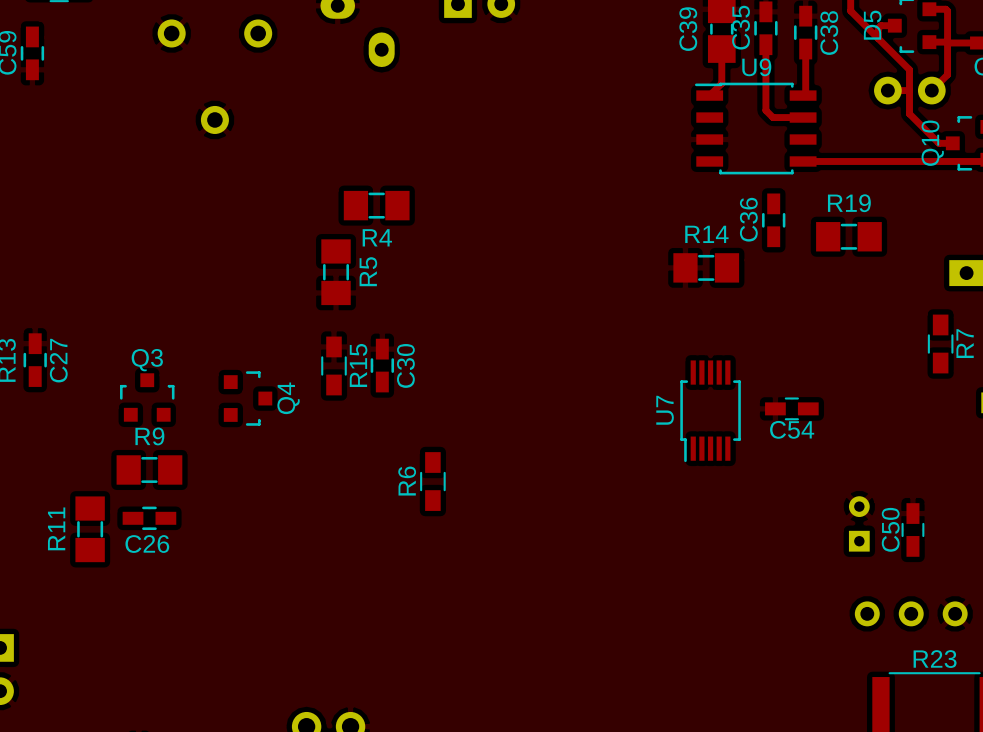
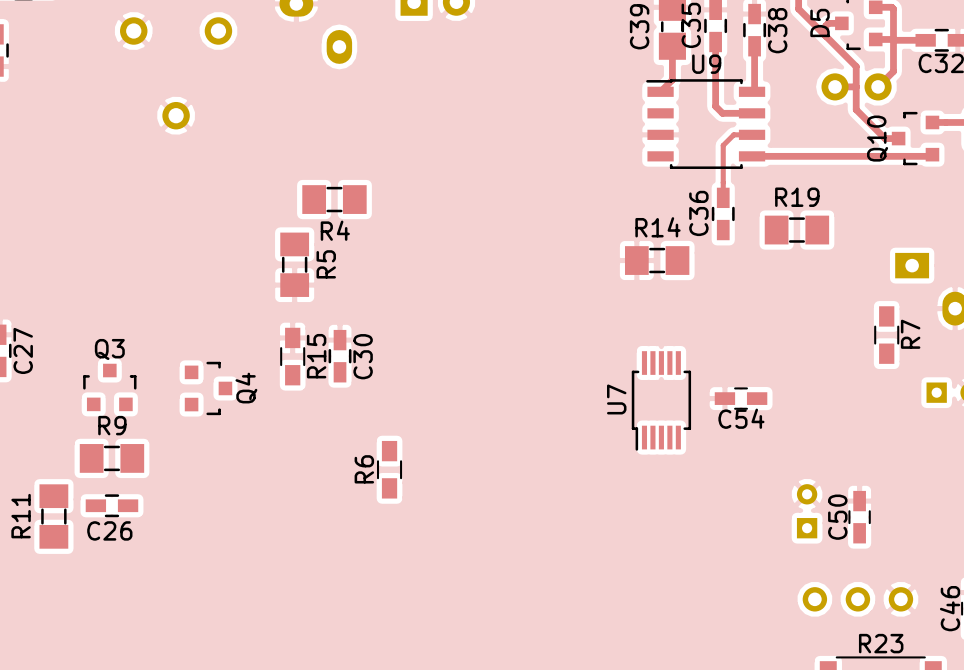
track: none -> (752, 134) (733, 134) (723, 145) (723, 197)

